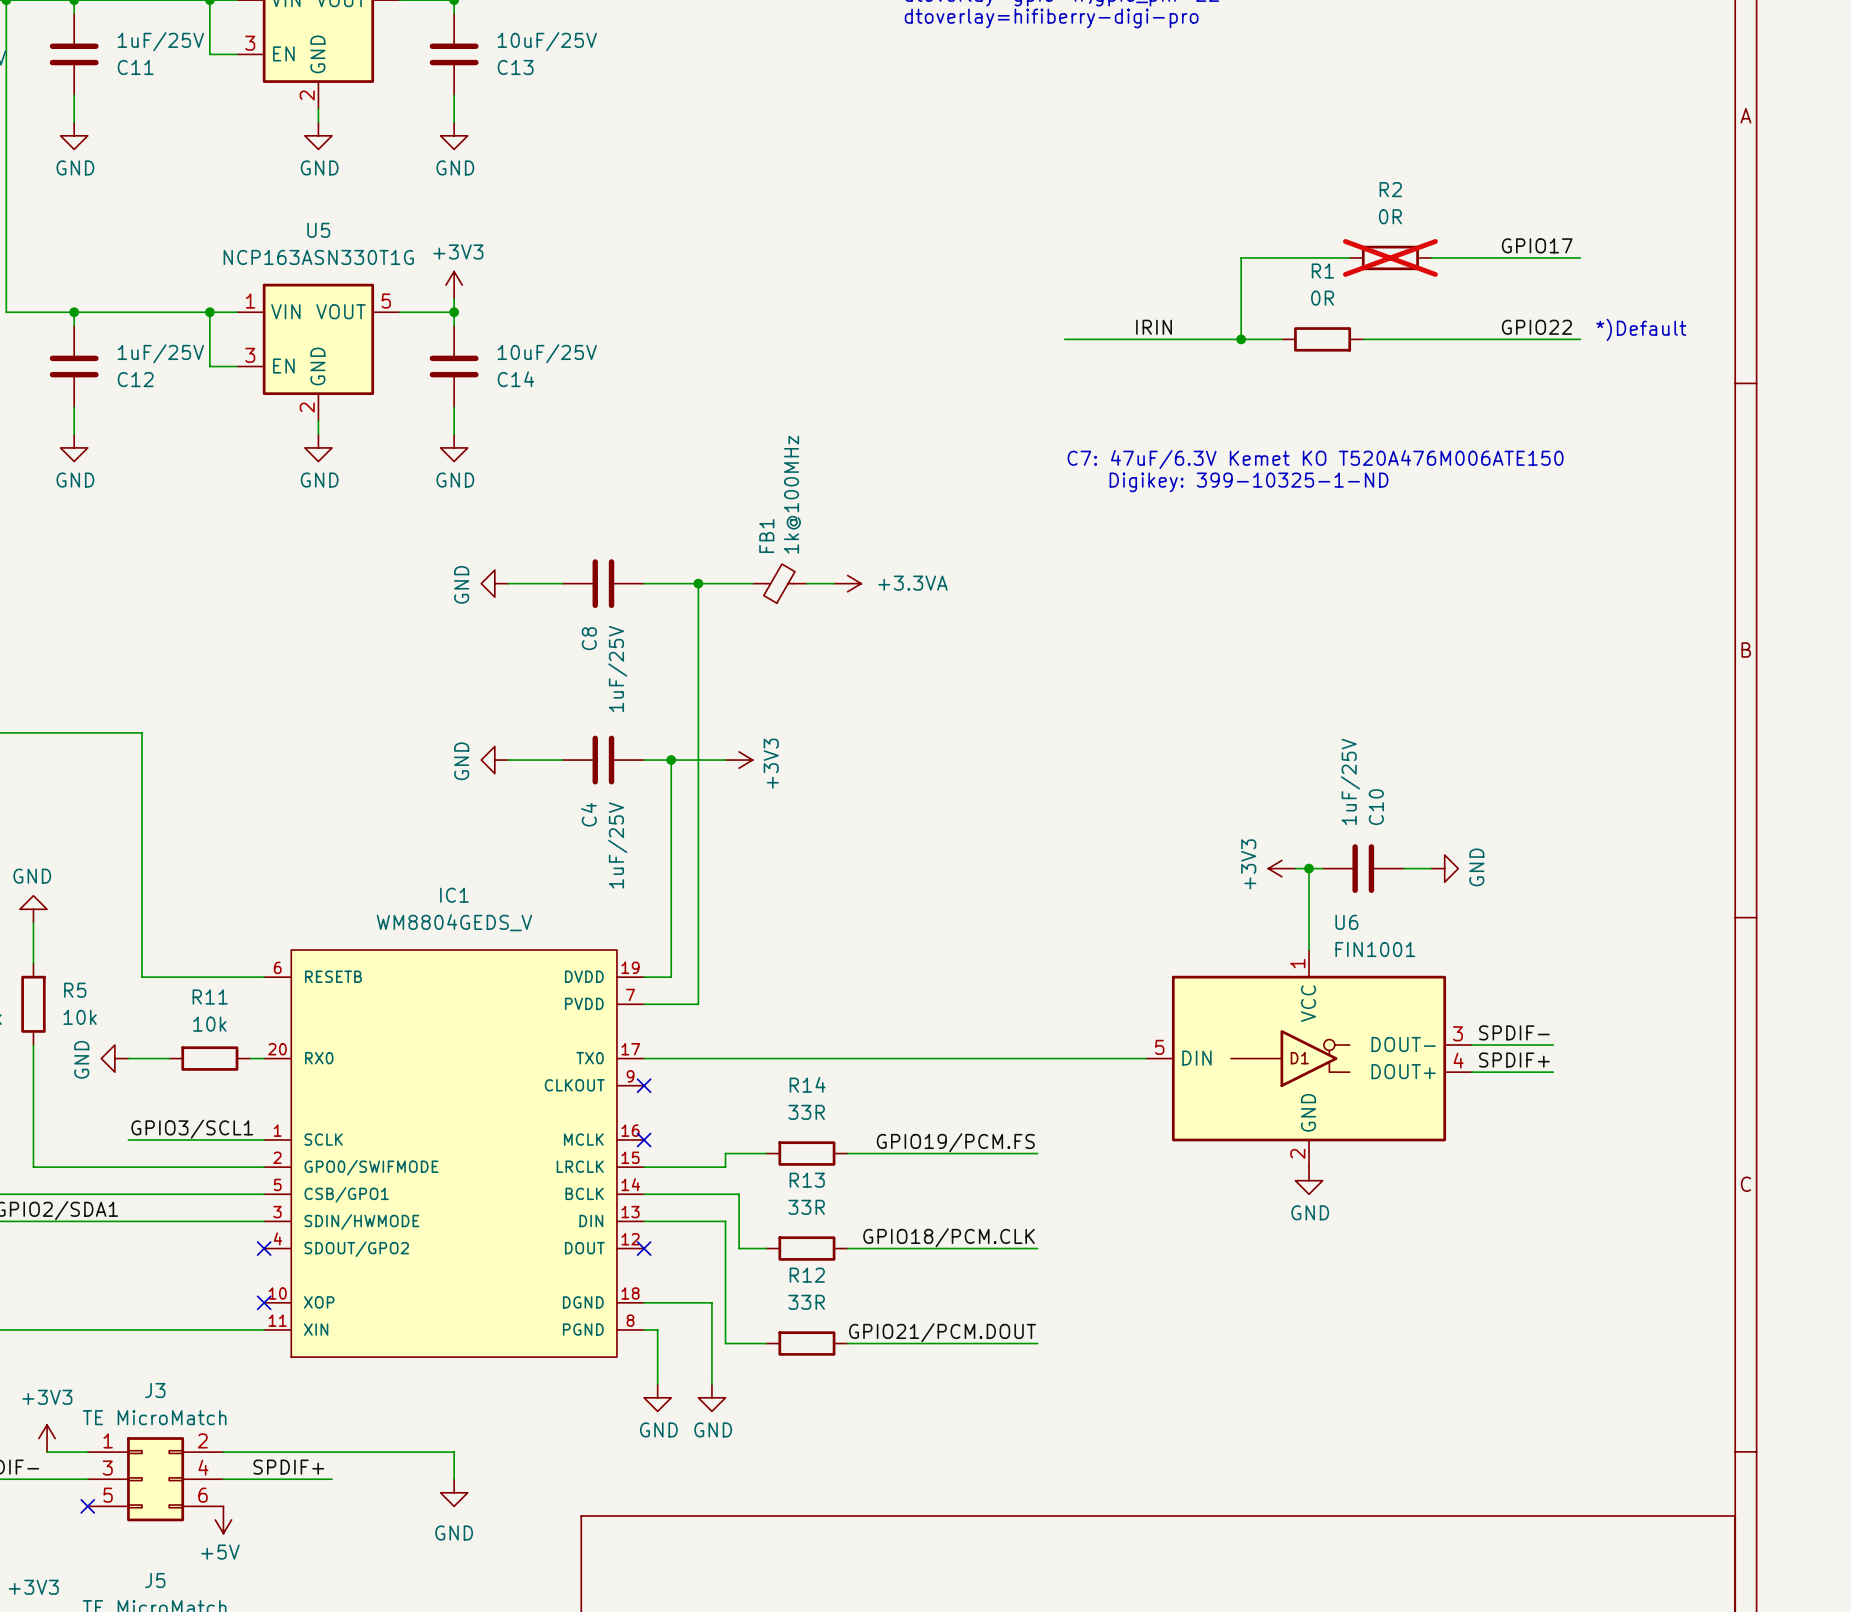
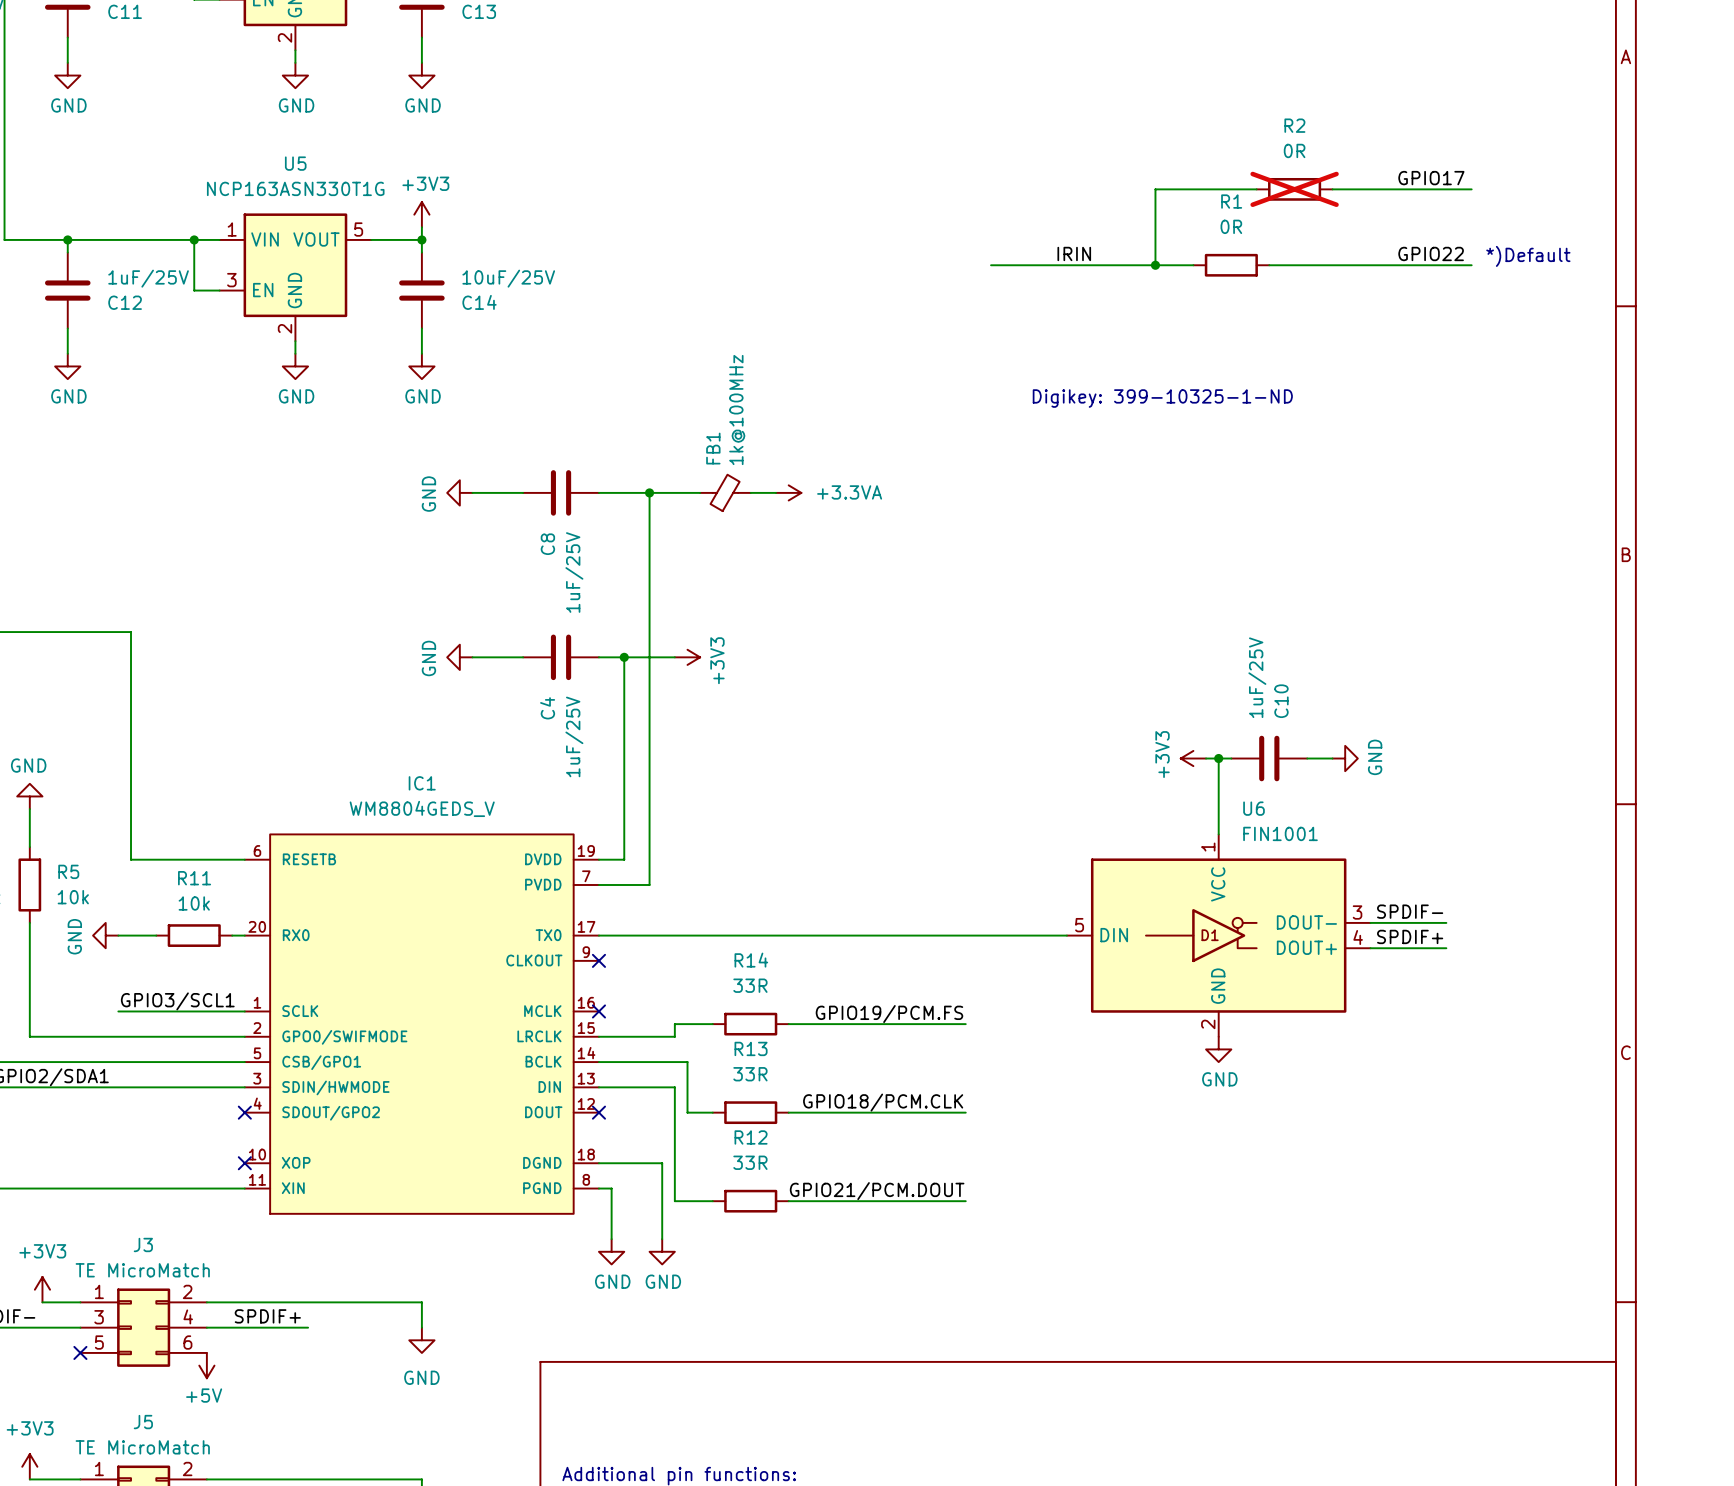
text: C7: 47uF/6.3V Kemet KO T520A476M006ATE150 (1315, 459) -> none

